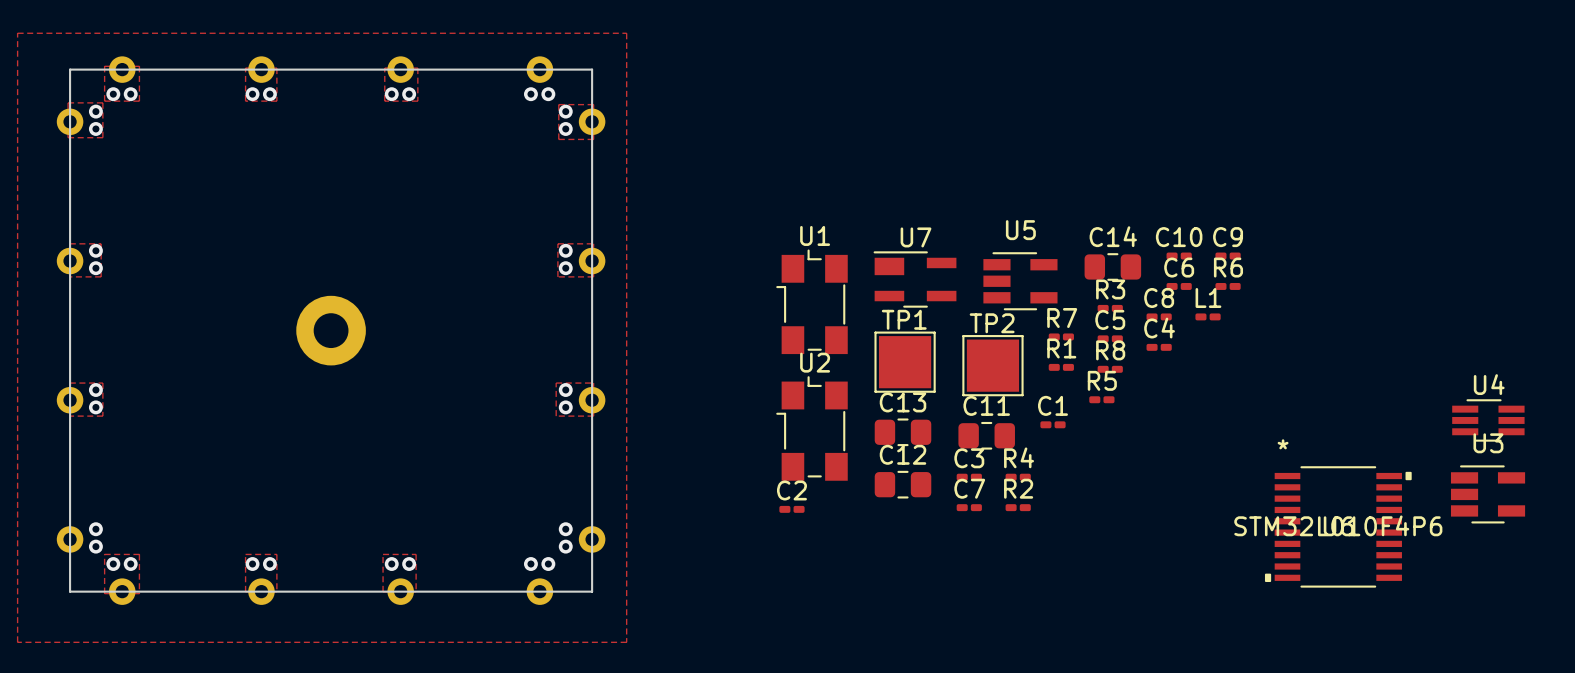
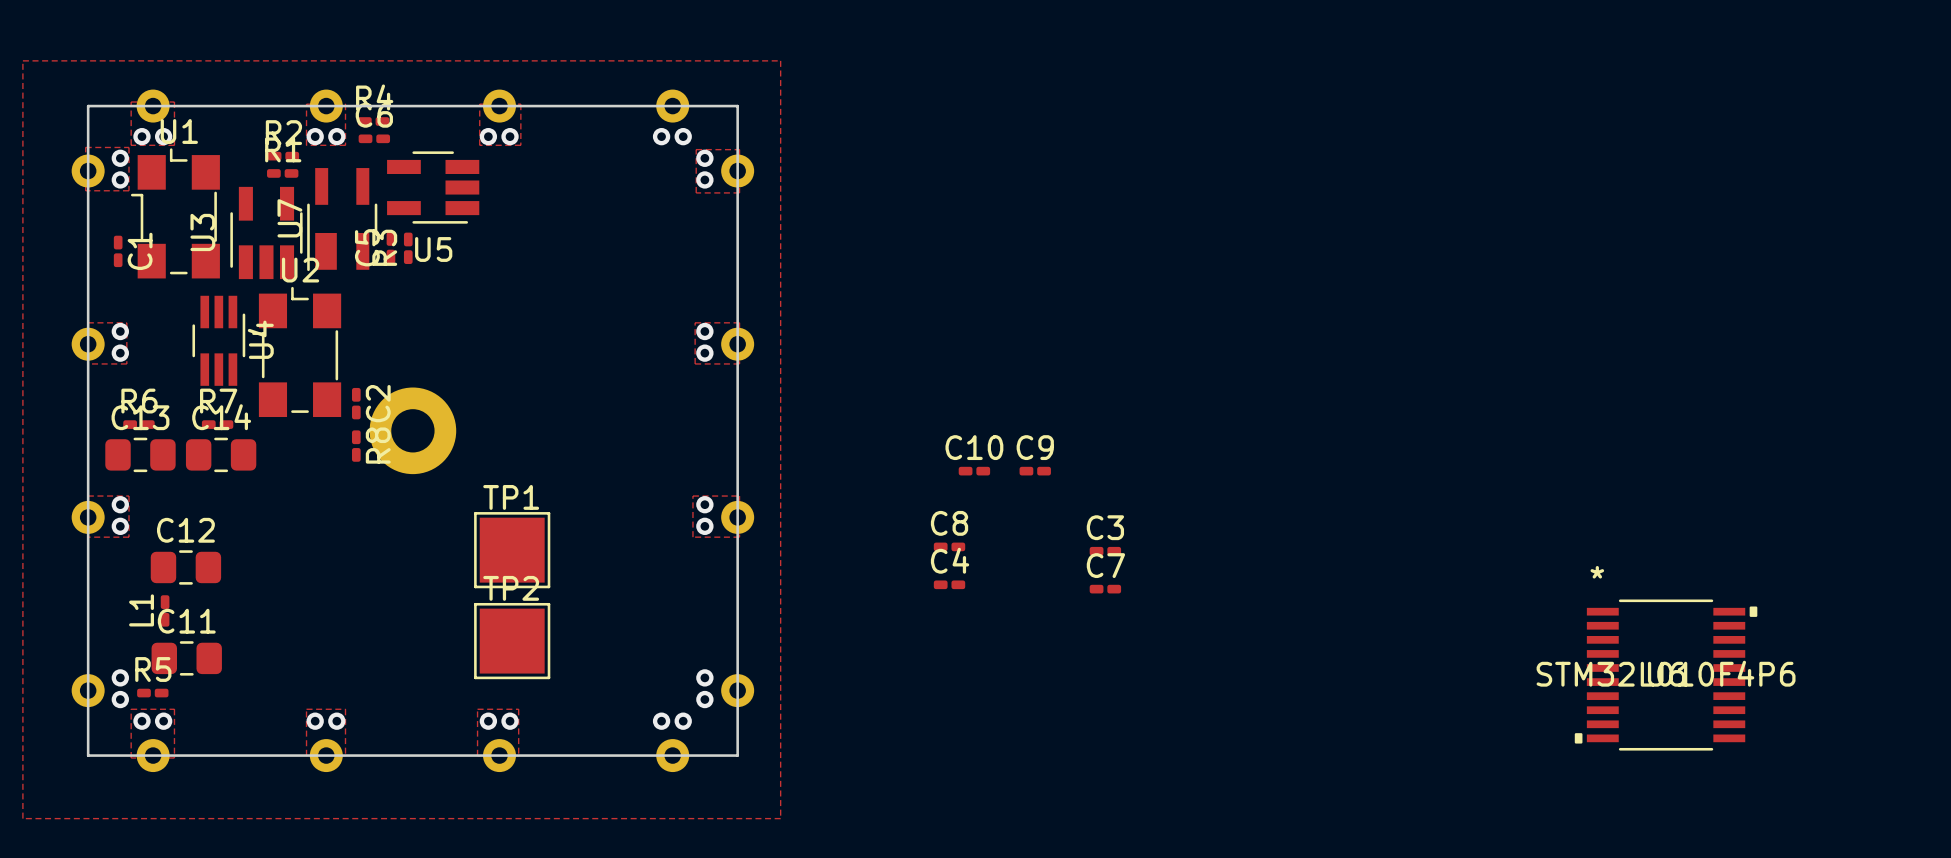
C10 position: (1179, 256) -> (974, 471)
C9 position: (1228, 256) -> (1035, 471)
C14 position: (1112, 266) -> (221, 454)
U7 rotation: 0° (915, 279) -> 90° counterclockwise (342, 219)
U7 position: (915, 279) -> (342, 219)
U5 rotation: 0° (1020, 281) -> 180° (433, 187)
U5 position: (1020, 281) -> (433, 187)
C6 position: (1179, 286) -> (374, 138)
R6 position: (1228, 286) -> (138, 424)
U1 position: (811, 301) -> (175, 213)
R3 rotation: 0° (1110, 308) -> 90° clockwise (408, 248)
R3 position: (1110, 308) -> (408, 248)
C8 position: (1159, 316) -> (949, 546)
L1 rotation: 0° (1208, 316) -> 90° clockwise (165, 610)
L1 position: (1208, 316) -> (165, 610)
R7 position: (1061, 336) -> (217, 424)
C5 rotation: 0° (1110, 338) -> 90° clockwise (390, 247)
C5 position: (1110, 338) -> (390, 247)
C4 position: (1159, 347) -> (949, 584)
TP1 position: (905, 362) -> (512, 550)
TP2 position: (992, 365) -> (512, 641)
R1 position: (1061, 367) -> (282, 173)
R8 rotation: 0° (1110, 369) -> 90° clockwise (356, 446)
R8 position: (1110, 369) -> (356, 446)
R5 position: (1101, 399) -> (152, 693)
U4 rotation: 0° (1488, 420) -> 90° clockwise (218, 340)
U4 position: (1488, 420) -> (218, 340)
C1 rotation: 0° (1052, 424) -> 90° clockwise (118, 251)
C1 position: (1052, 424) -> (118, 251)
U2 position: (811, 428) -> (296, 351)
C13 position: (902, 432) -> (140, 454)
C11 position: (986, 435) -> (186, 658)
C3 position: (969, 477) -> (1105, 551)
R4 position: (1018, 477) -> (373, 121)
C12 position: (902, 484) -> (185, 567)
U3 rotation: 0° (1488, 494) -> 90° counterclockwise (266, 232)
U3 position: (1488, 494) -> (266, 232)
C7 position: (969, 507) -> (1105, 589)
R2 position: (1018, 507) -> (283, 156)
C2 rotation: 0° (791, 509) -> 90° clockwise (356, 403)
C2 position: (791, 509) -> (356, 403)

